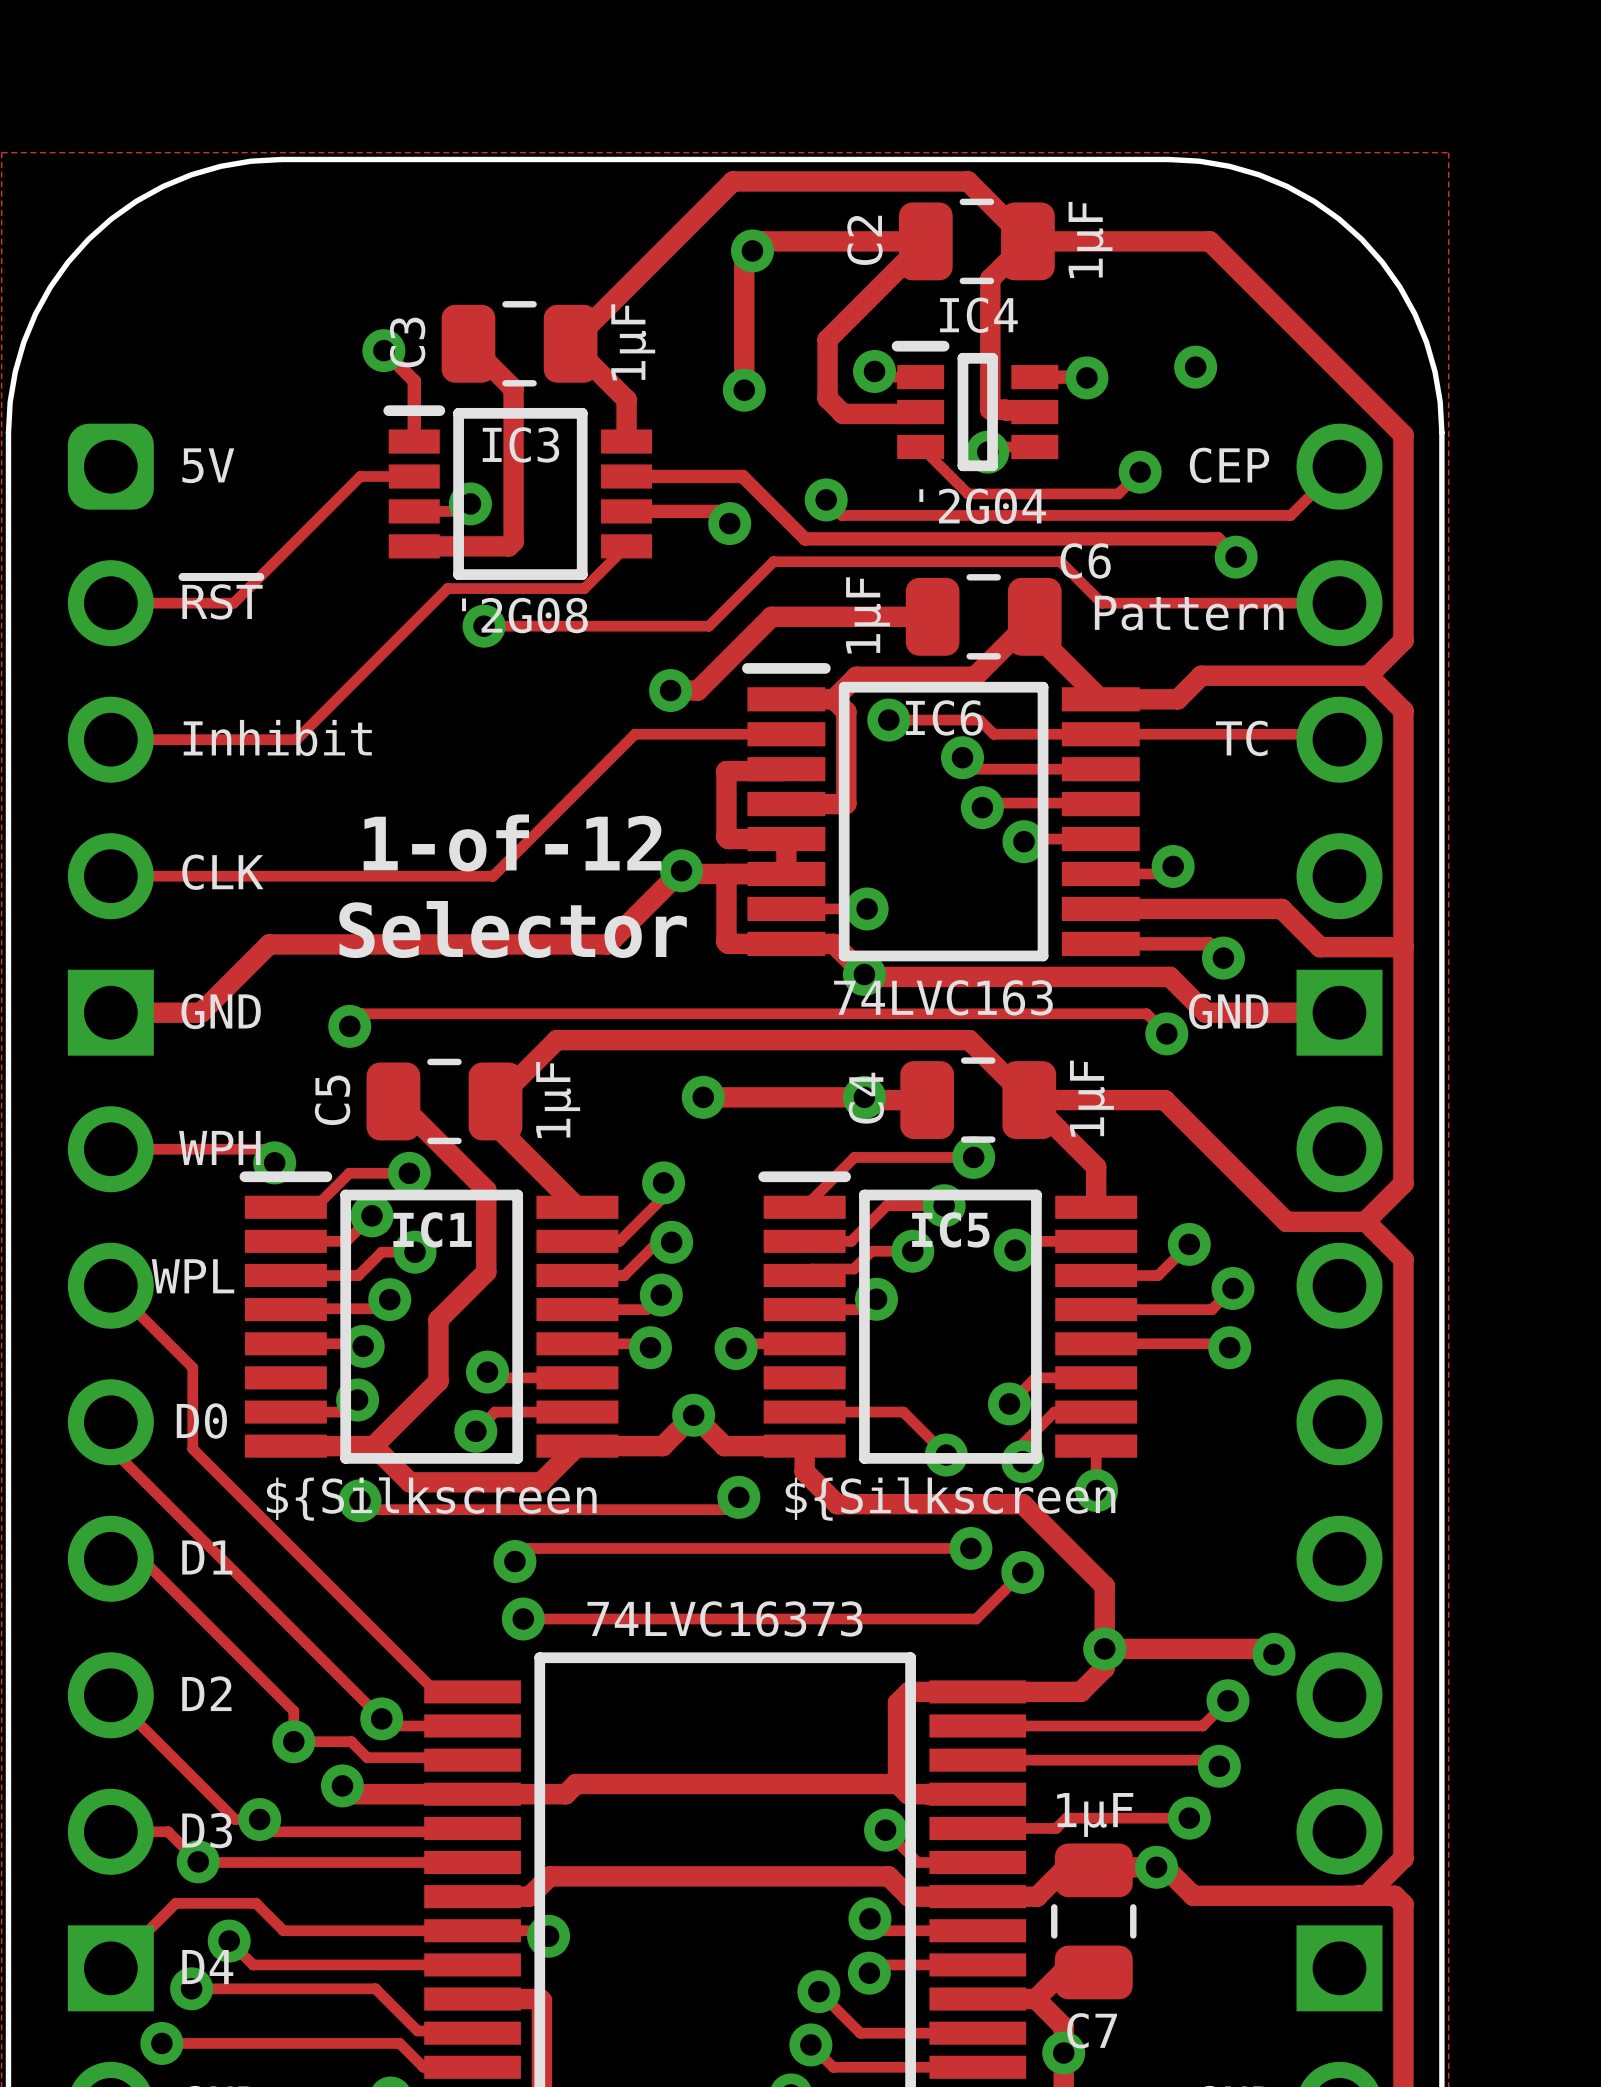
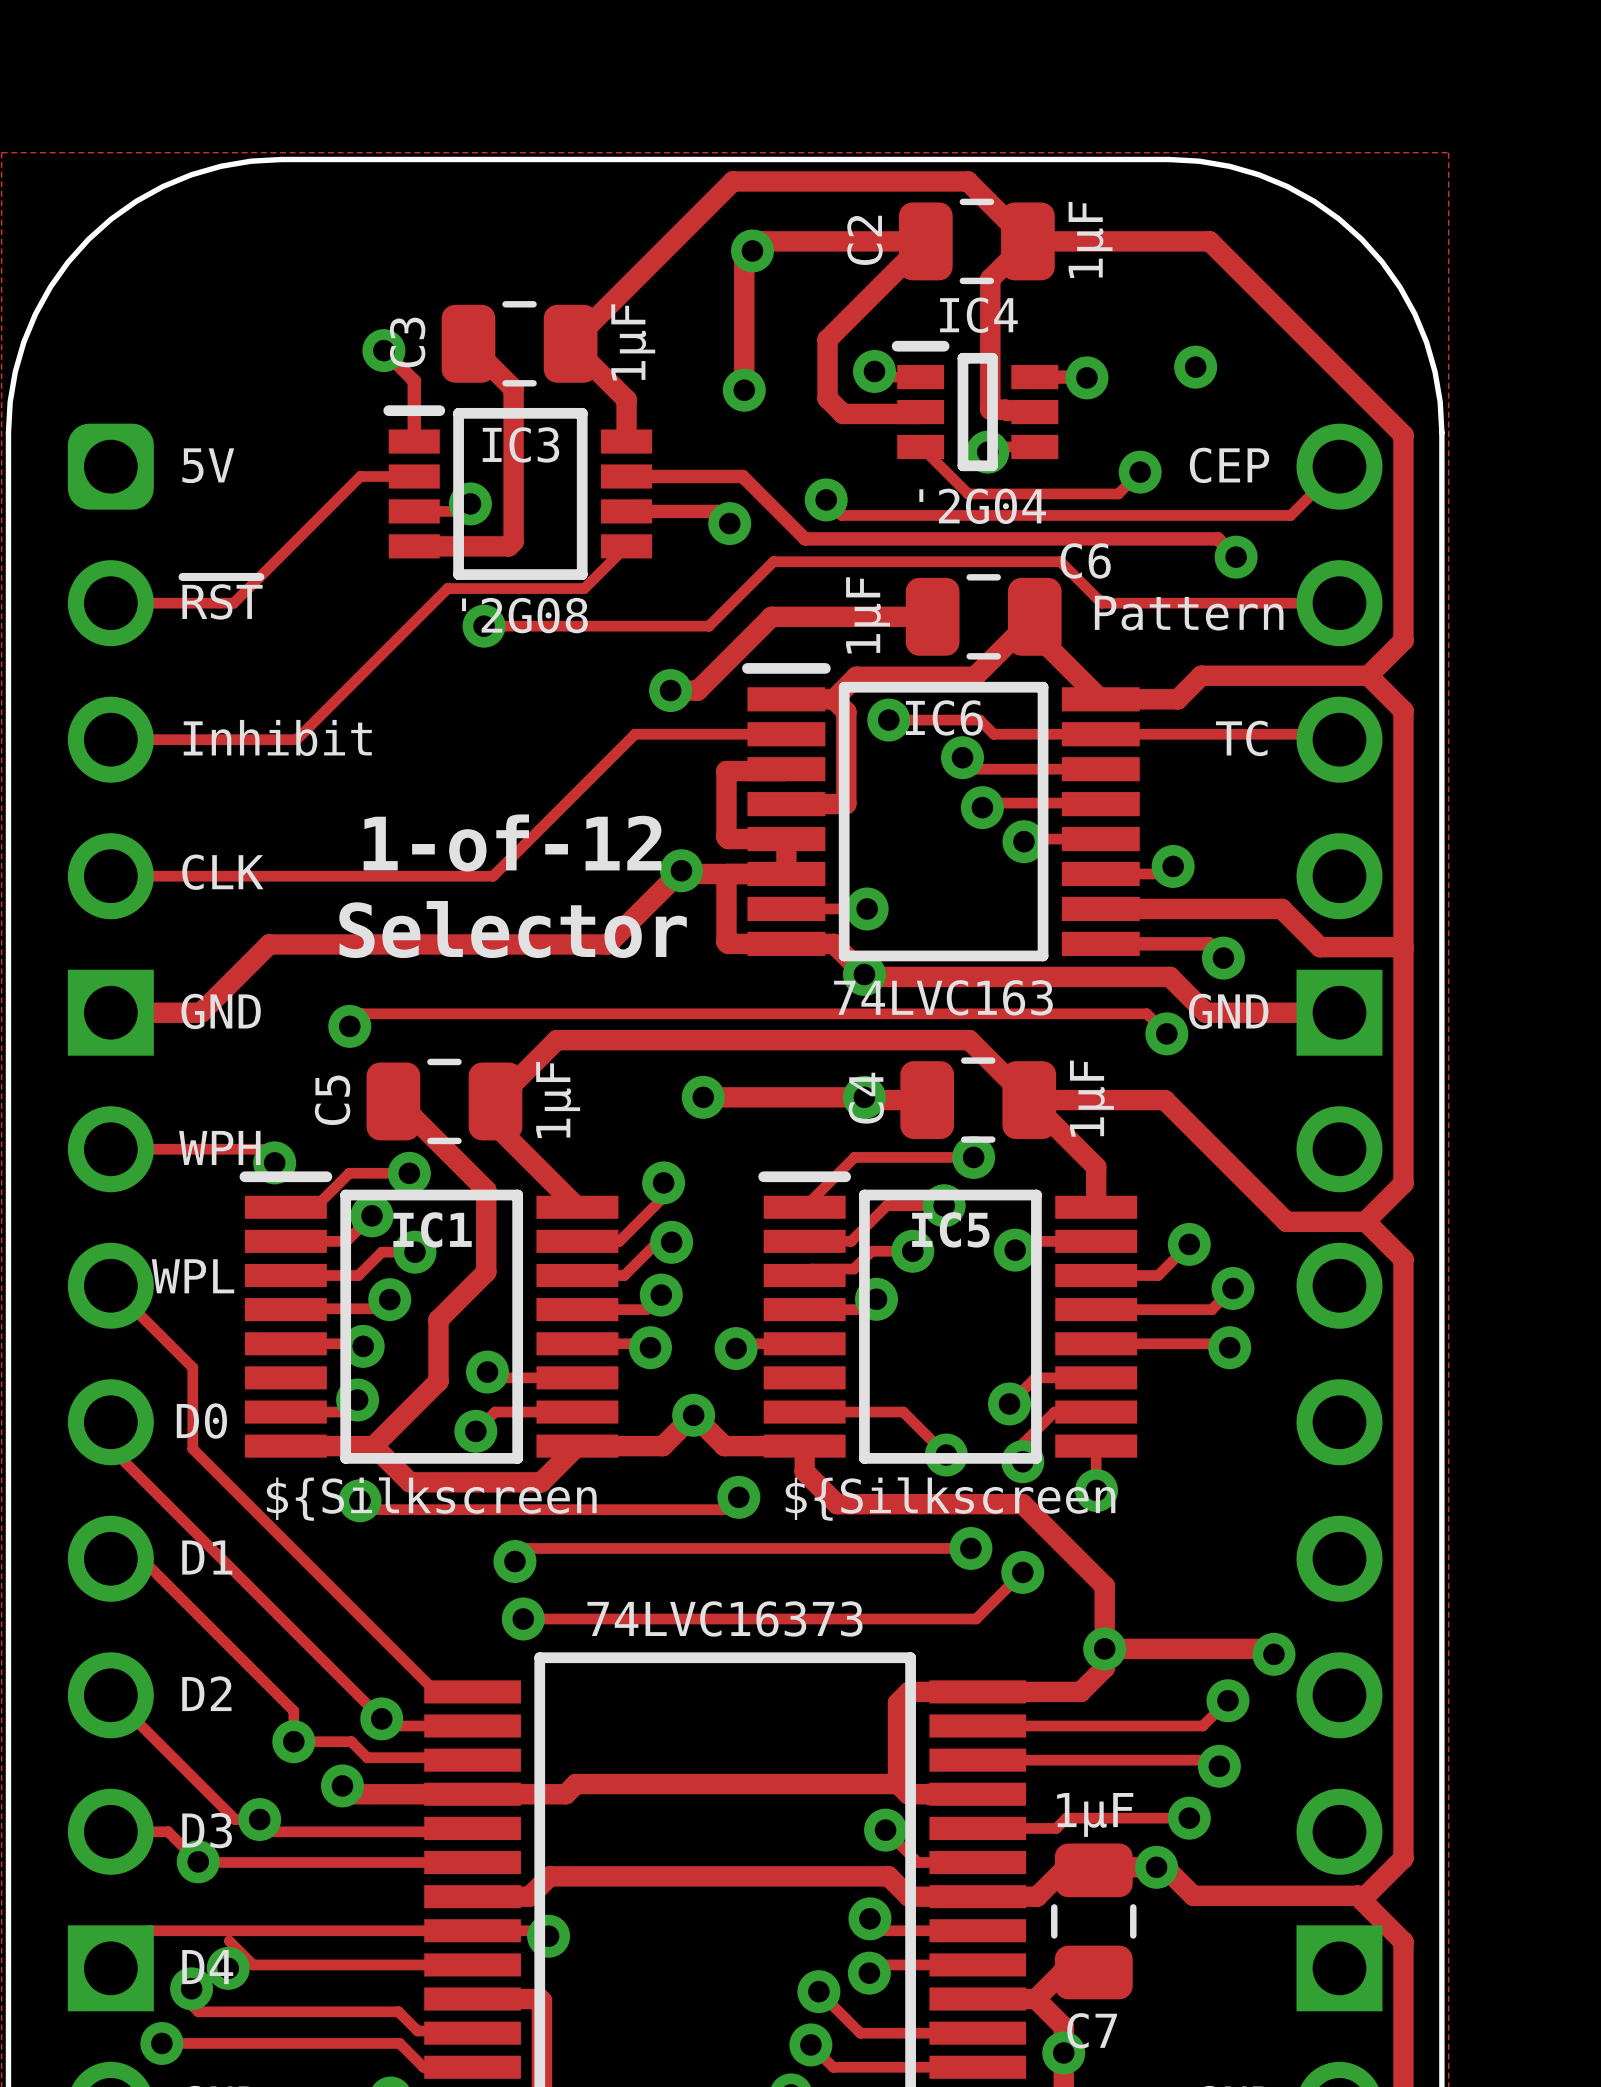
track: (1365, 1895) (1394, 1895) (1403, 1904) (1403, 1941) -> (1357, 1895) (1403, 1941)
track: (148, 1930) (175, 1903) (256, 1903) (283, 1930) -> (148, 1930) (283, 1930)
via position: (229, 1941) -> (228, 1968)
track: (191, 1988) (375, 1988) (398, 2011) -> (181, 1995) (198, 2011) (398, 2011)

